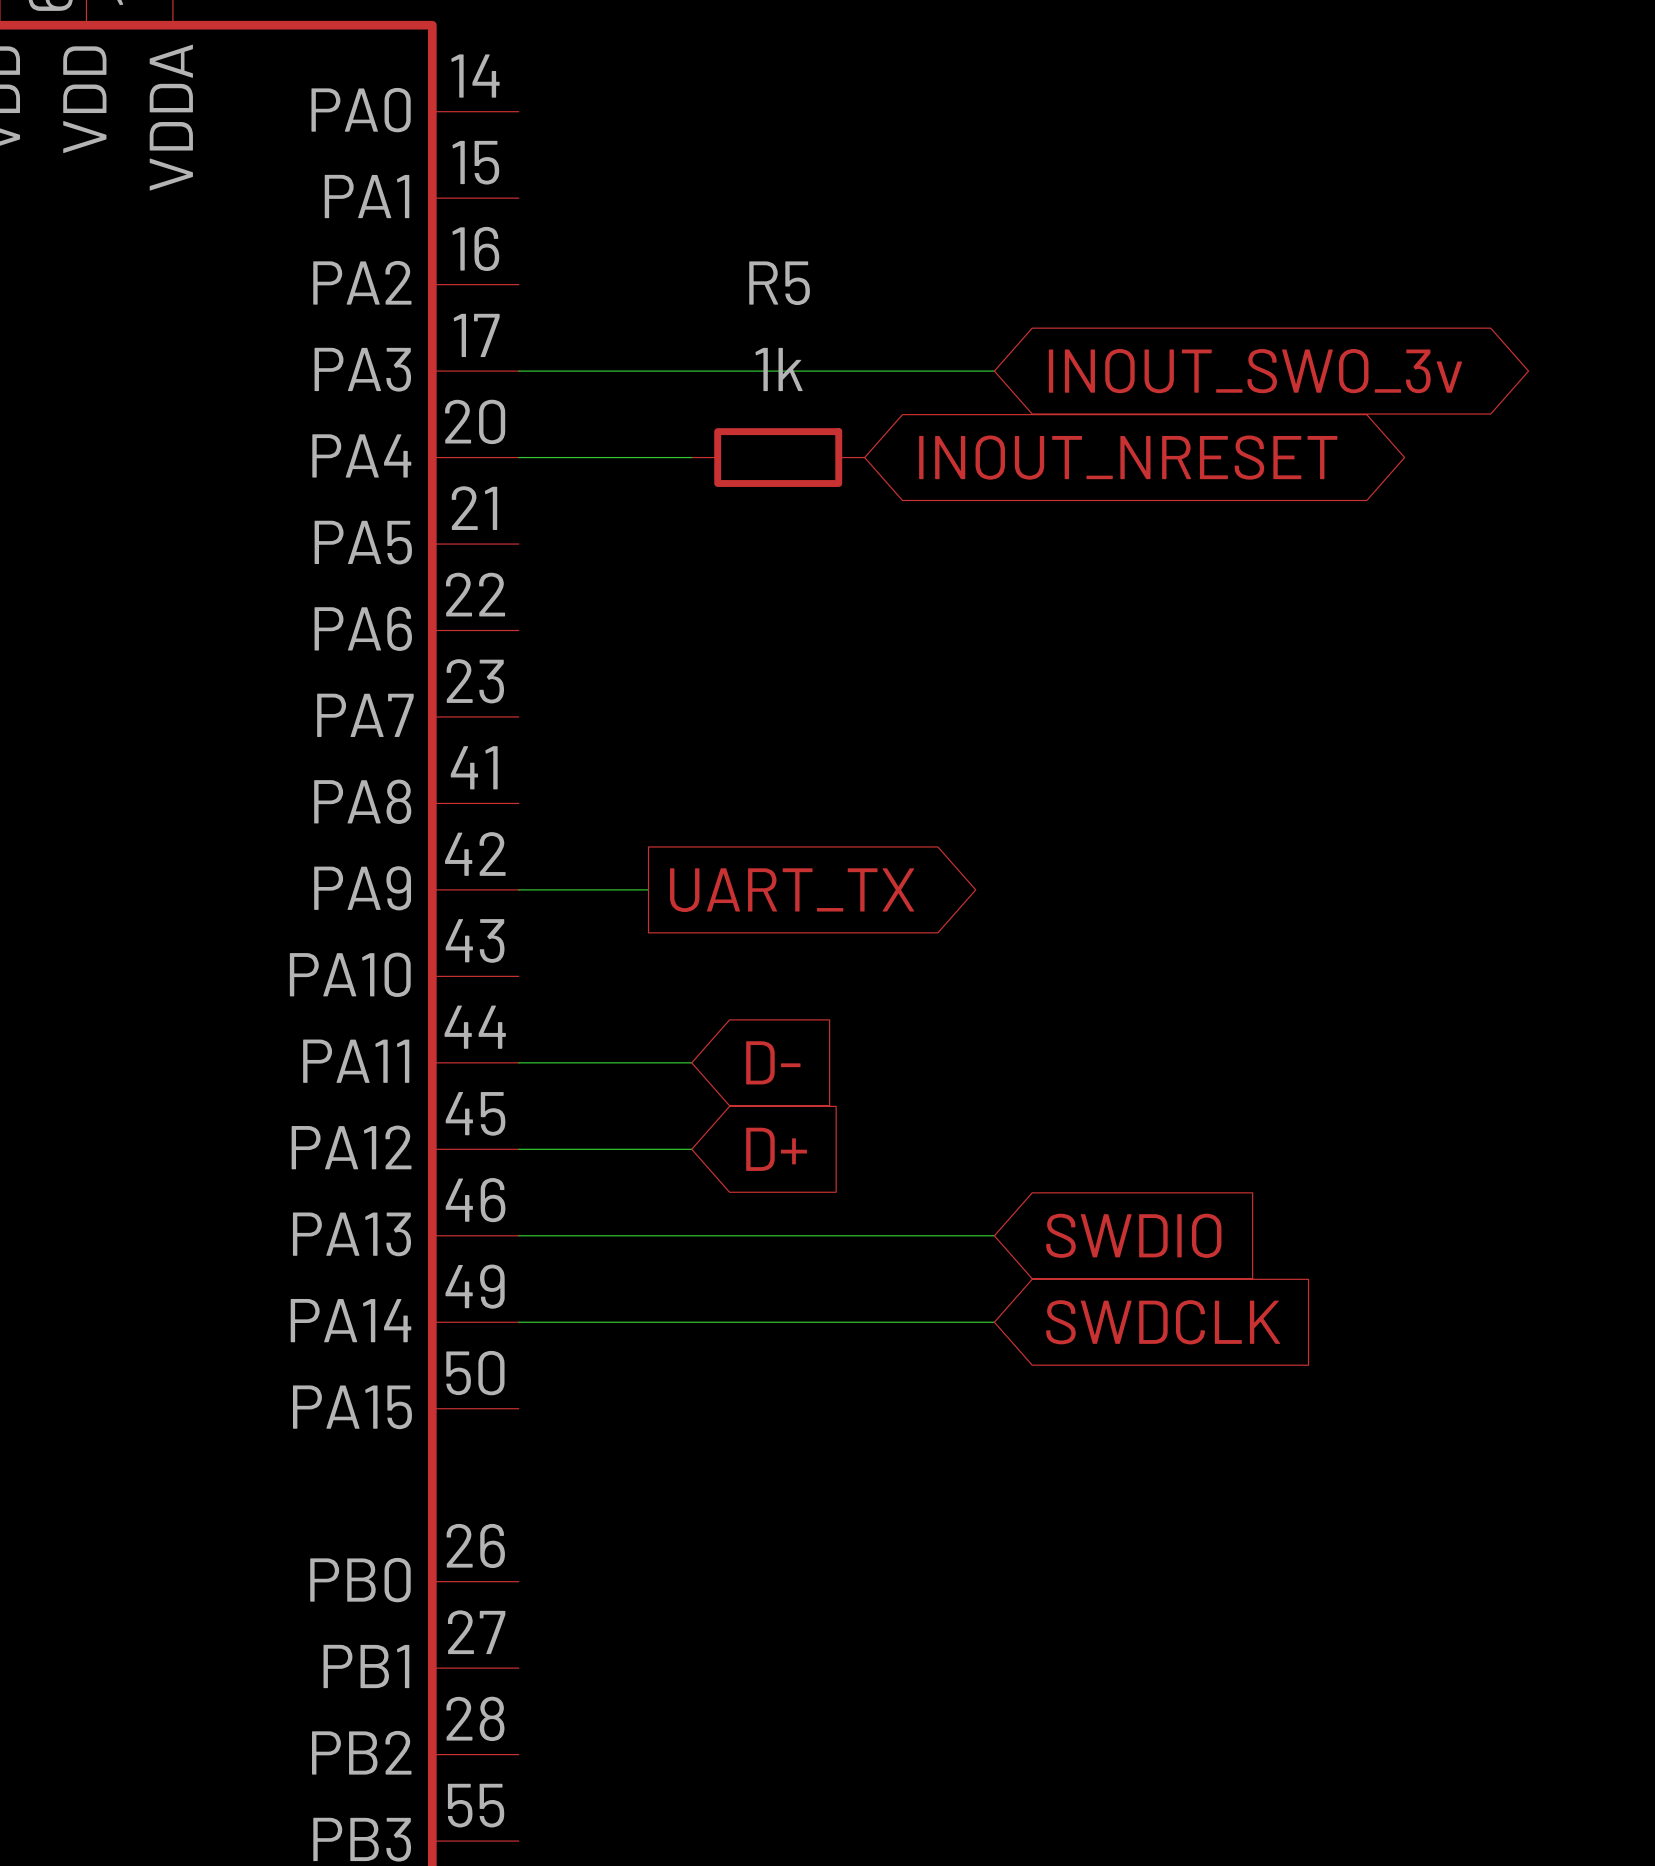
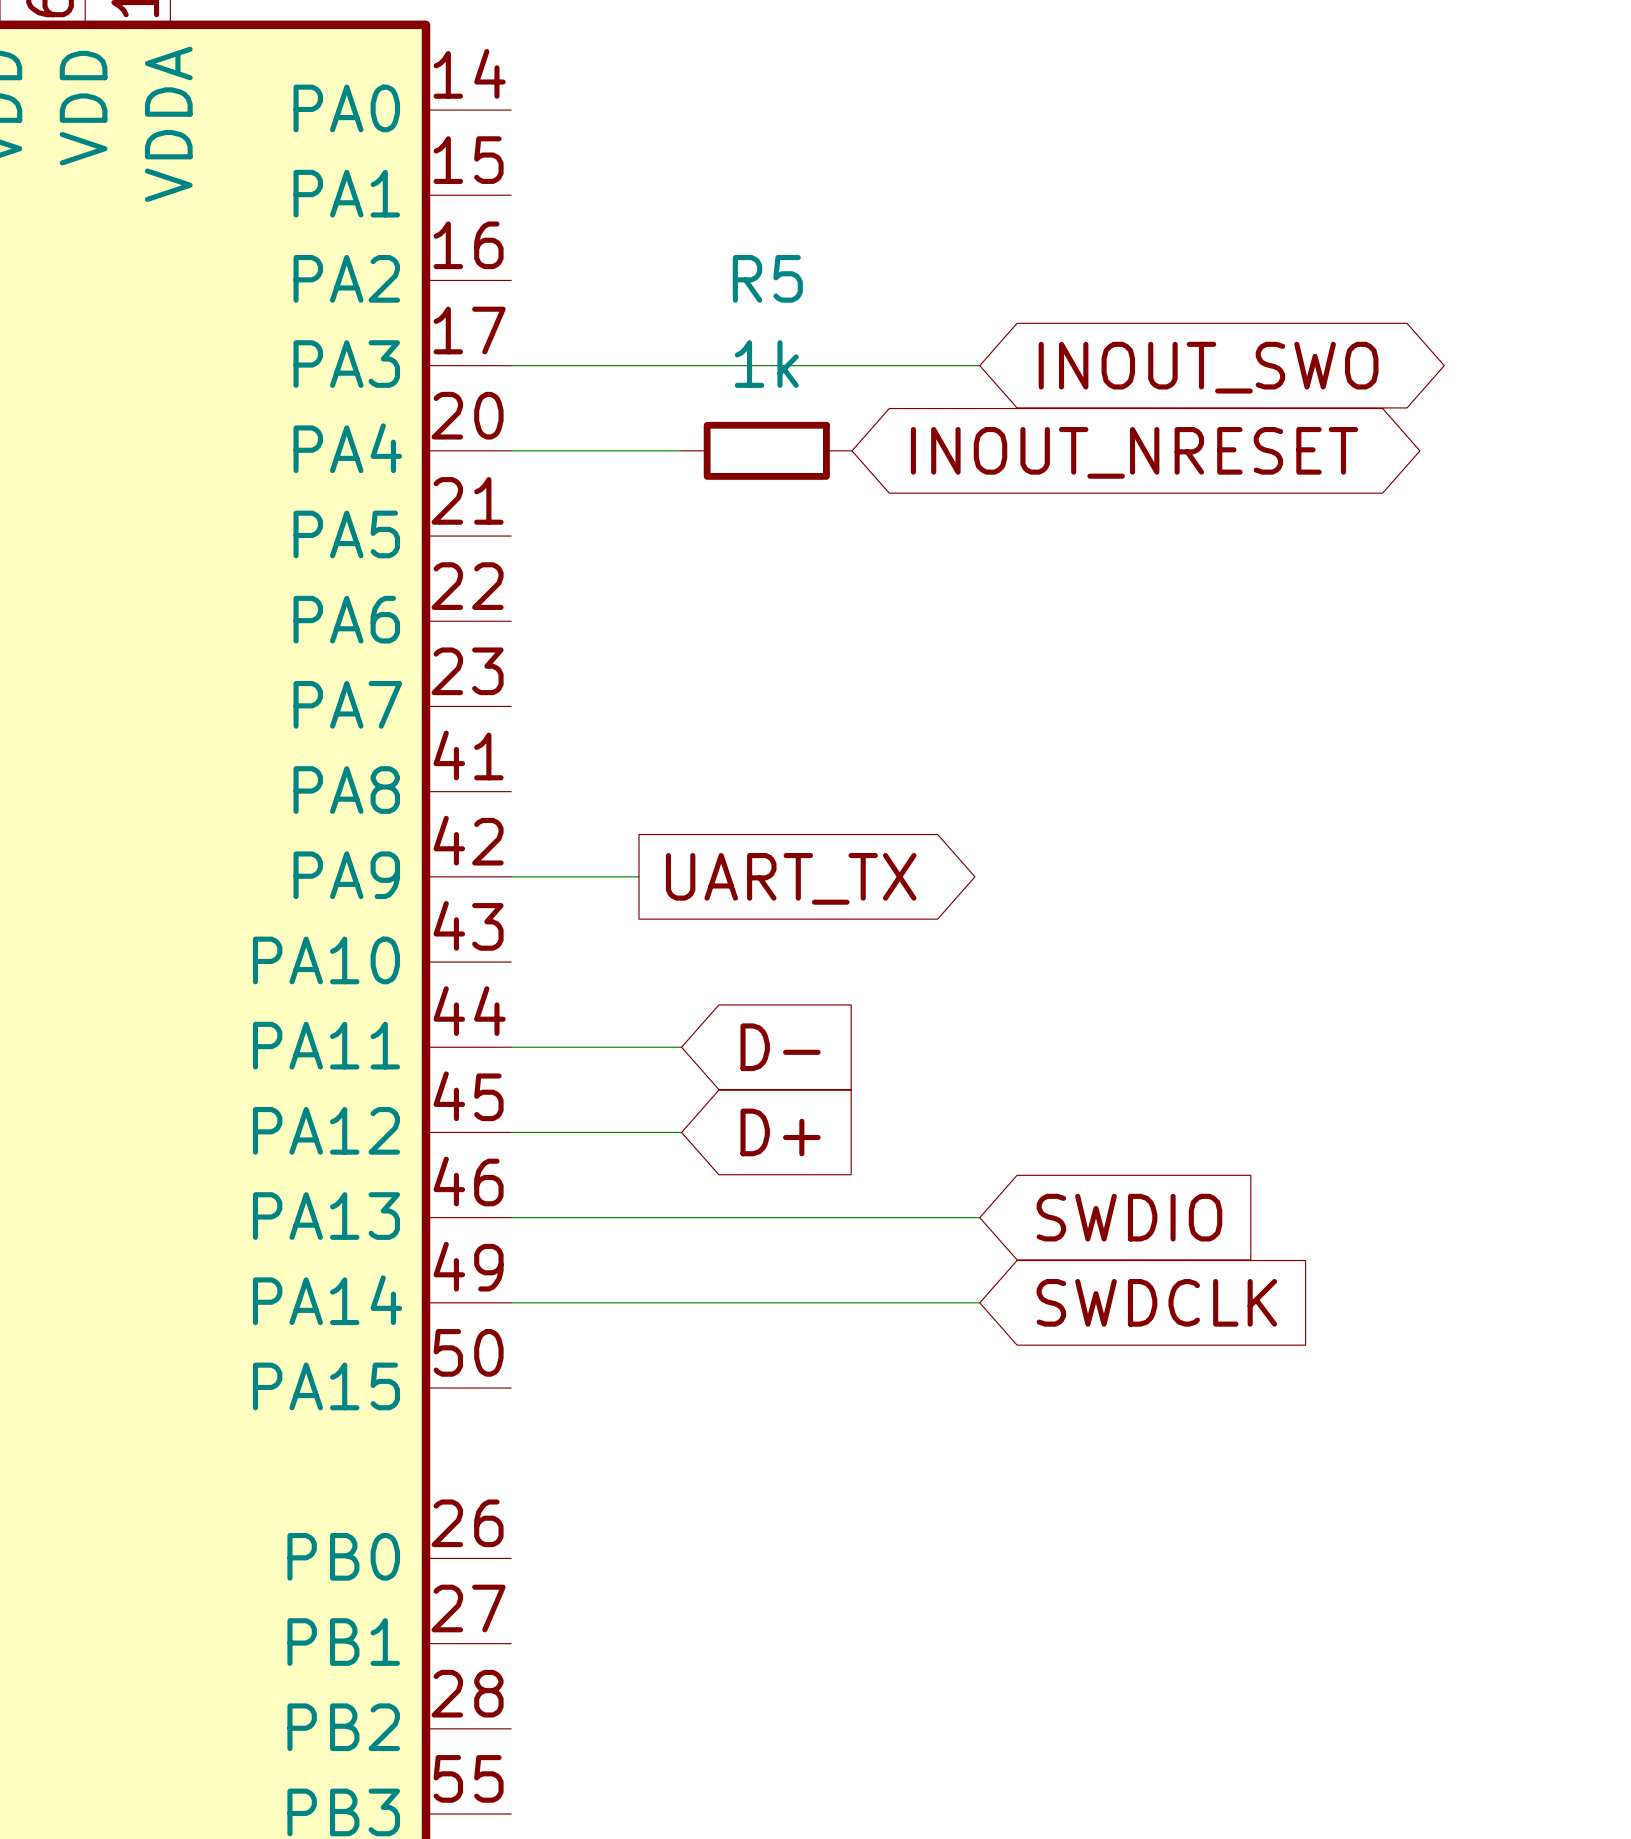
global label: INOUT_SWO_3v (1255, 371) -> INOUT_SWO (1208, 367)

